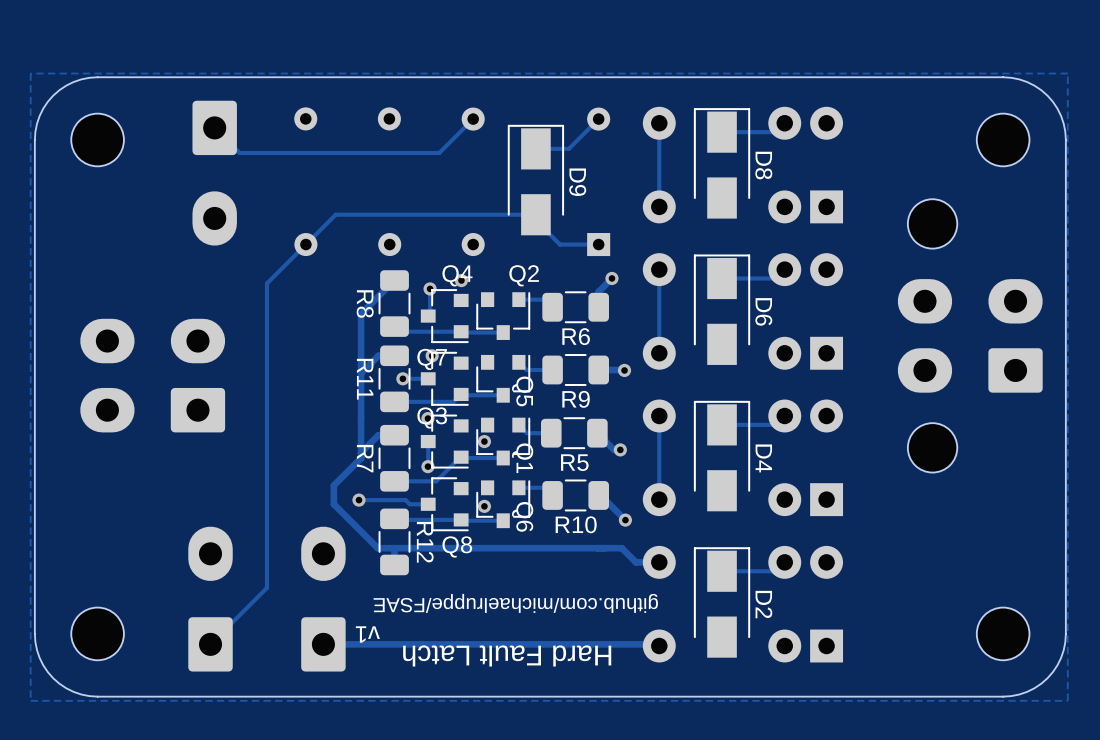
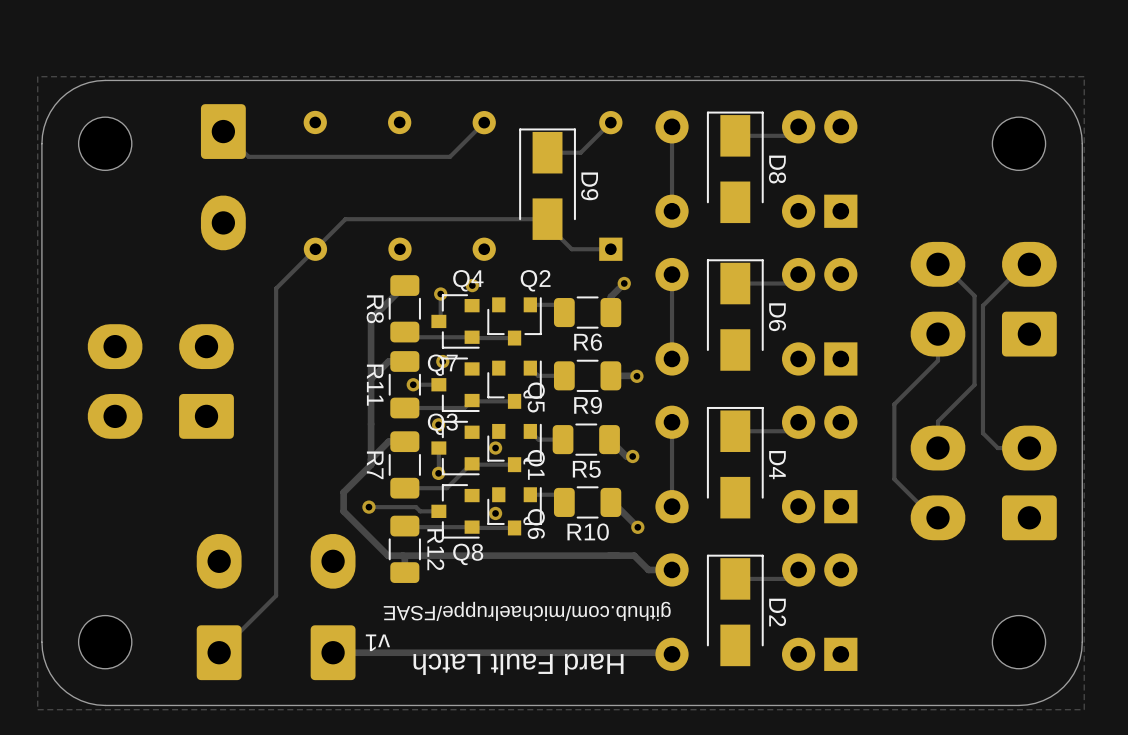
track: none -> (938, 264) (942, 264) (974, 295) (974, 384) (938, 421) (938, 448)
track: none -> (1029, 264) (1024, 264) (982, 305) (982, 433) (997, 448) (1029, 448)
part: none -> (983, 299)
track: none -> (938, 334) (938, 360) (894, 404) (894, 479) (933, 517) (938, 517)
part: (970, 335) -> none
part: none -> (983, 482)

